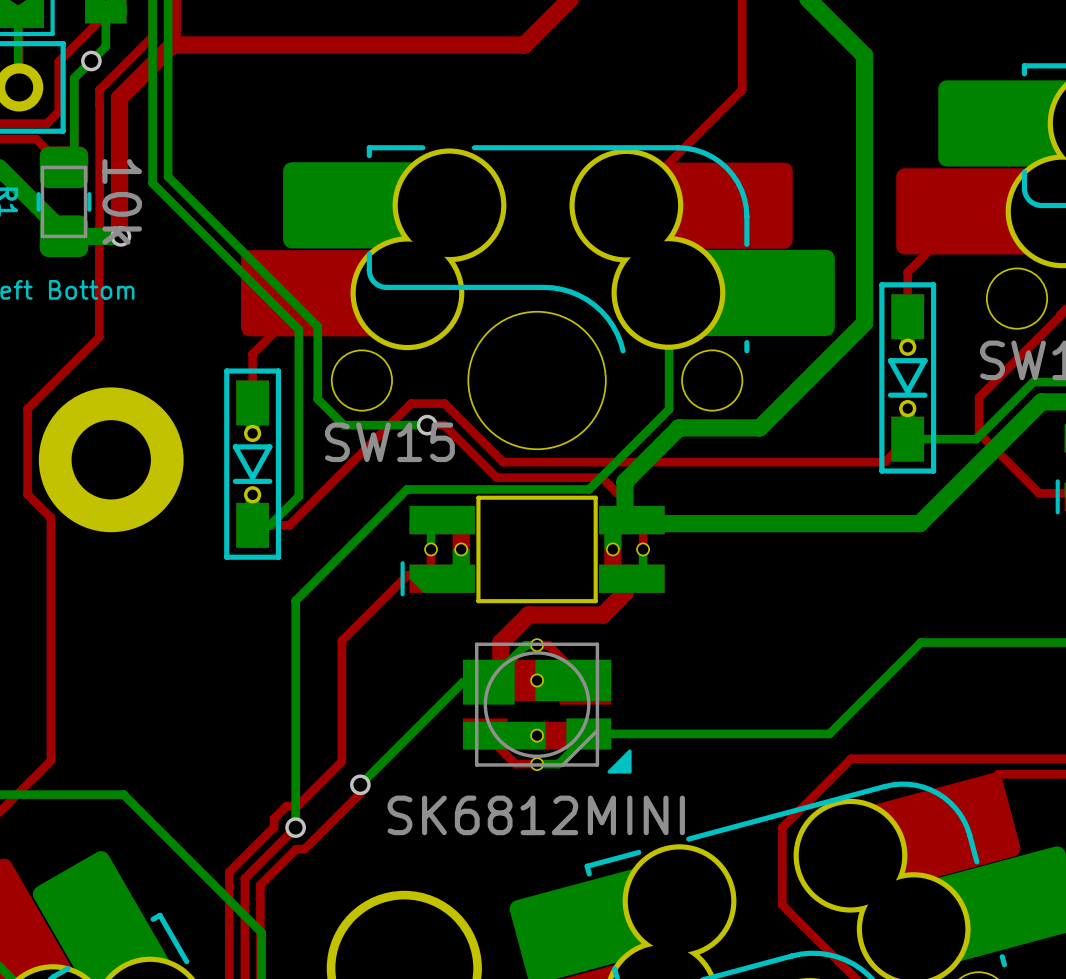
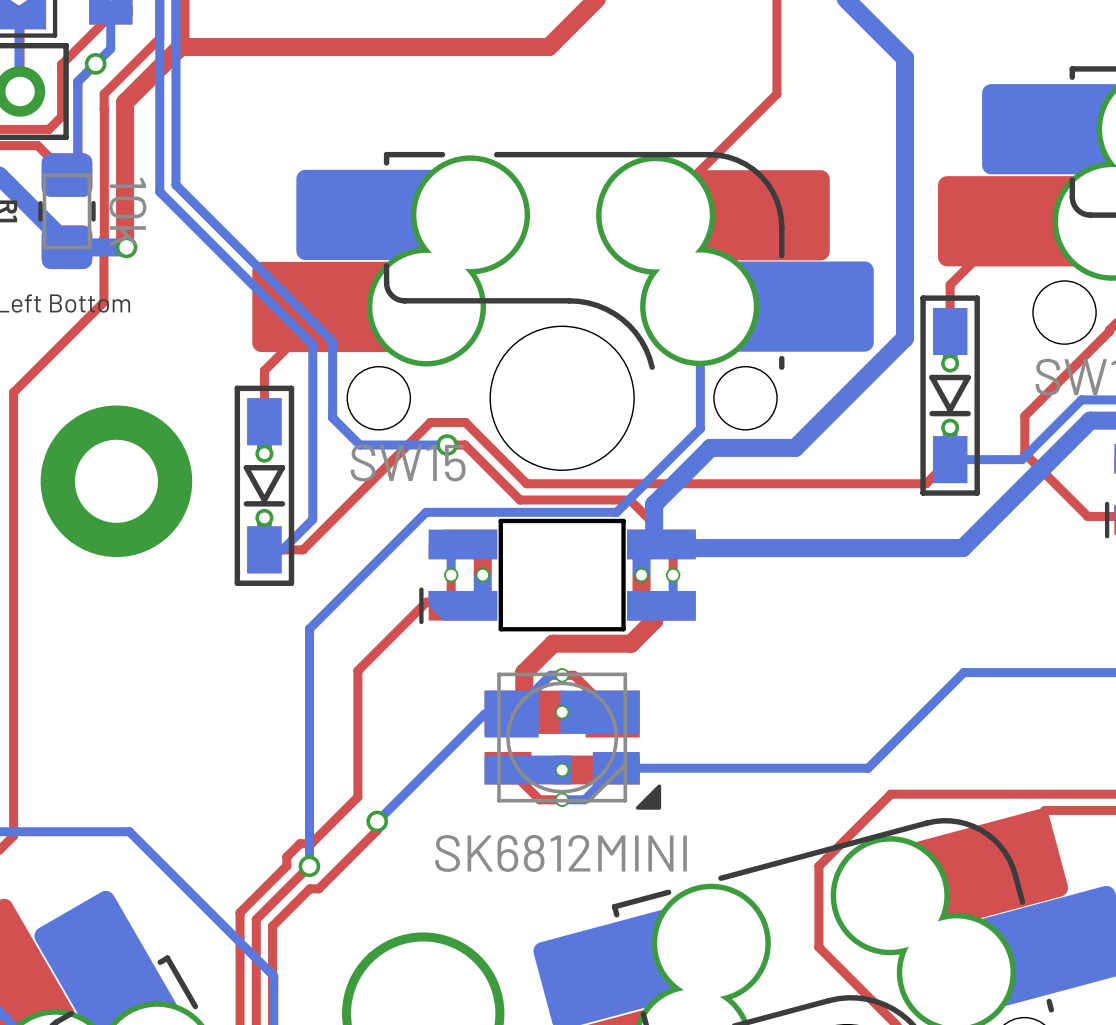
top track: (99, 288) (99, 337) (27, 408) (27, 494) (50, 517) (50, 760) (12, 798) -> (103, 302) (13, 392) (13, 835)

